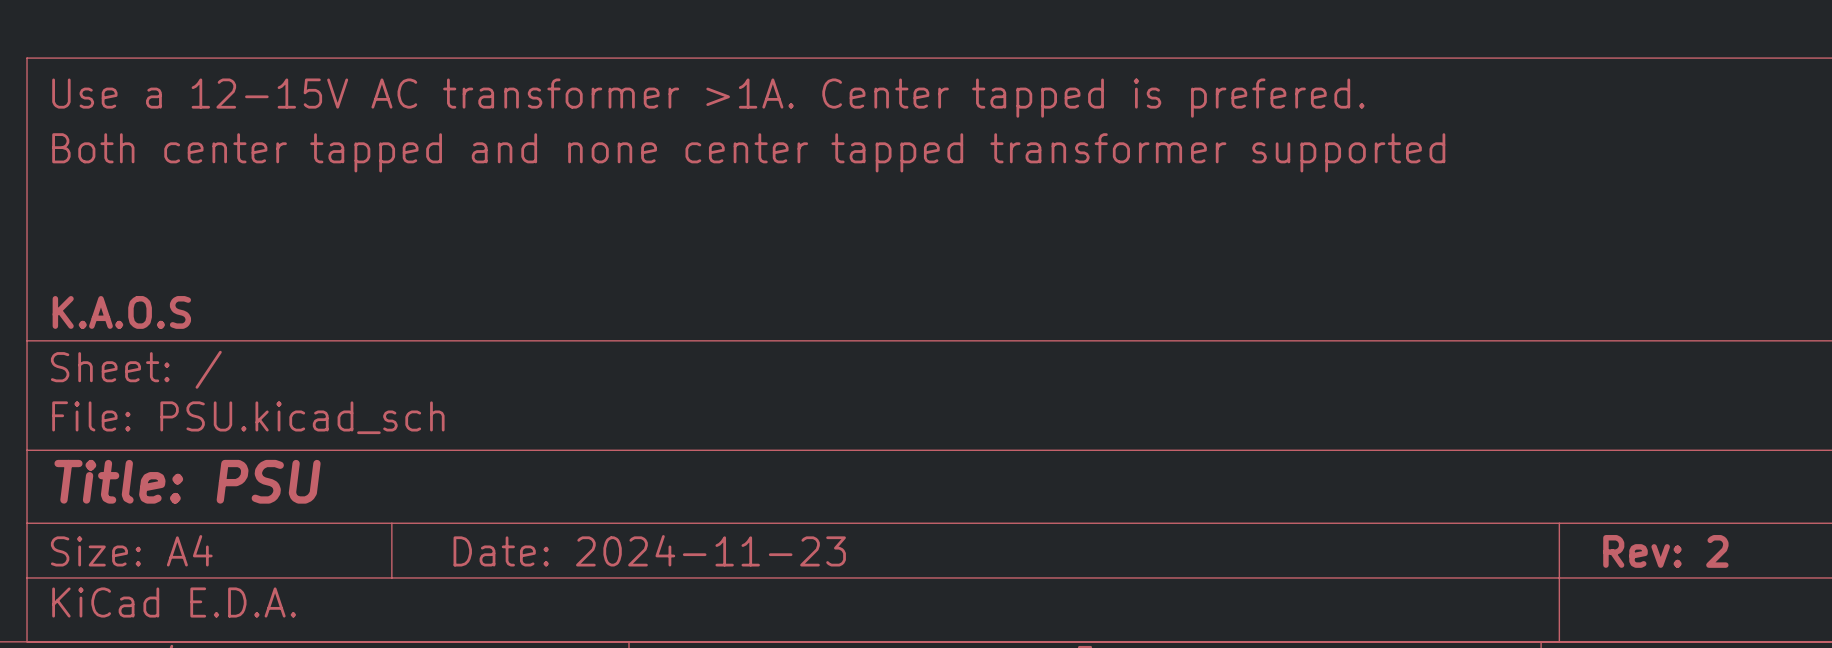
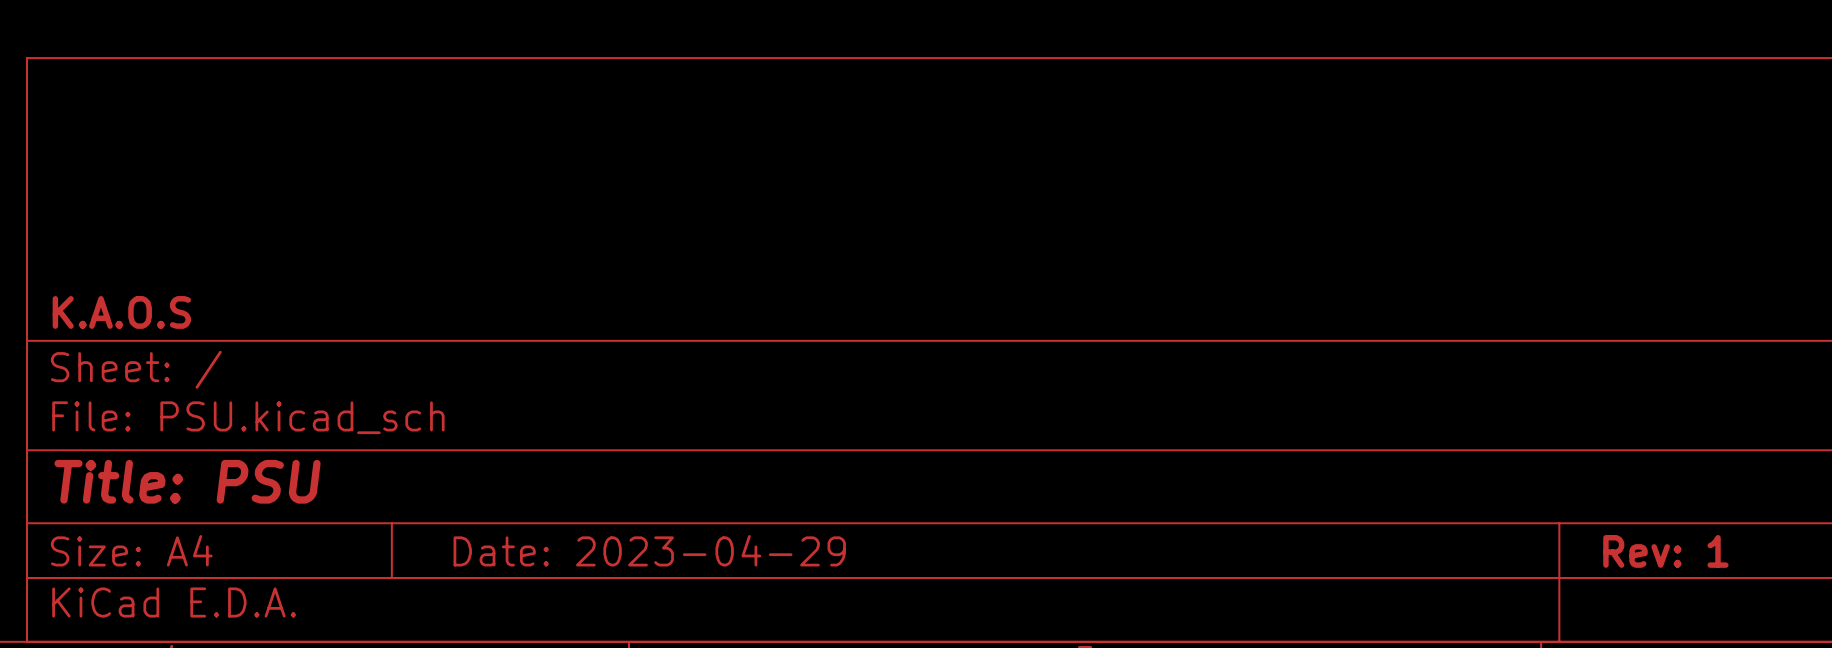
title block: Use a 12-15V AC transformer >1A. Center tapped is prefered. (708, 98) -> none
title block: Both center tapped and none center tapped transformer supported (748, 152) -> none
title block: Date: 2024-11-23 (649, 550) -> Date: 2023-04-29 (649, 550)
title block: Rev: 2 (1665, 551) -> Rev: 1 (1665, 551)

